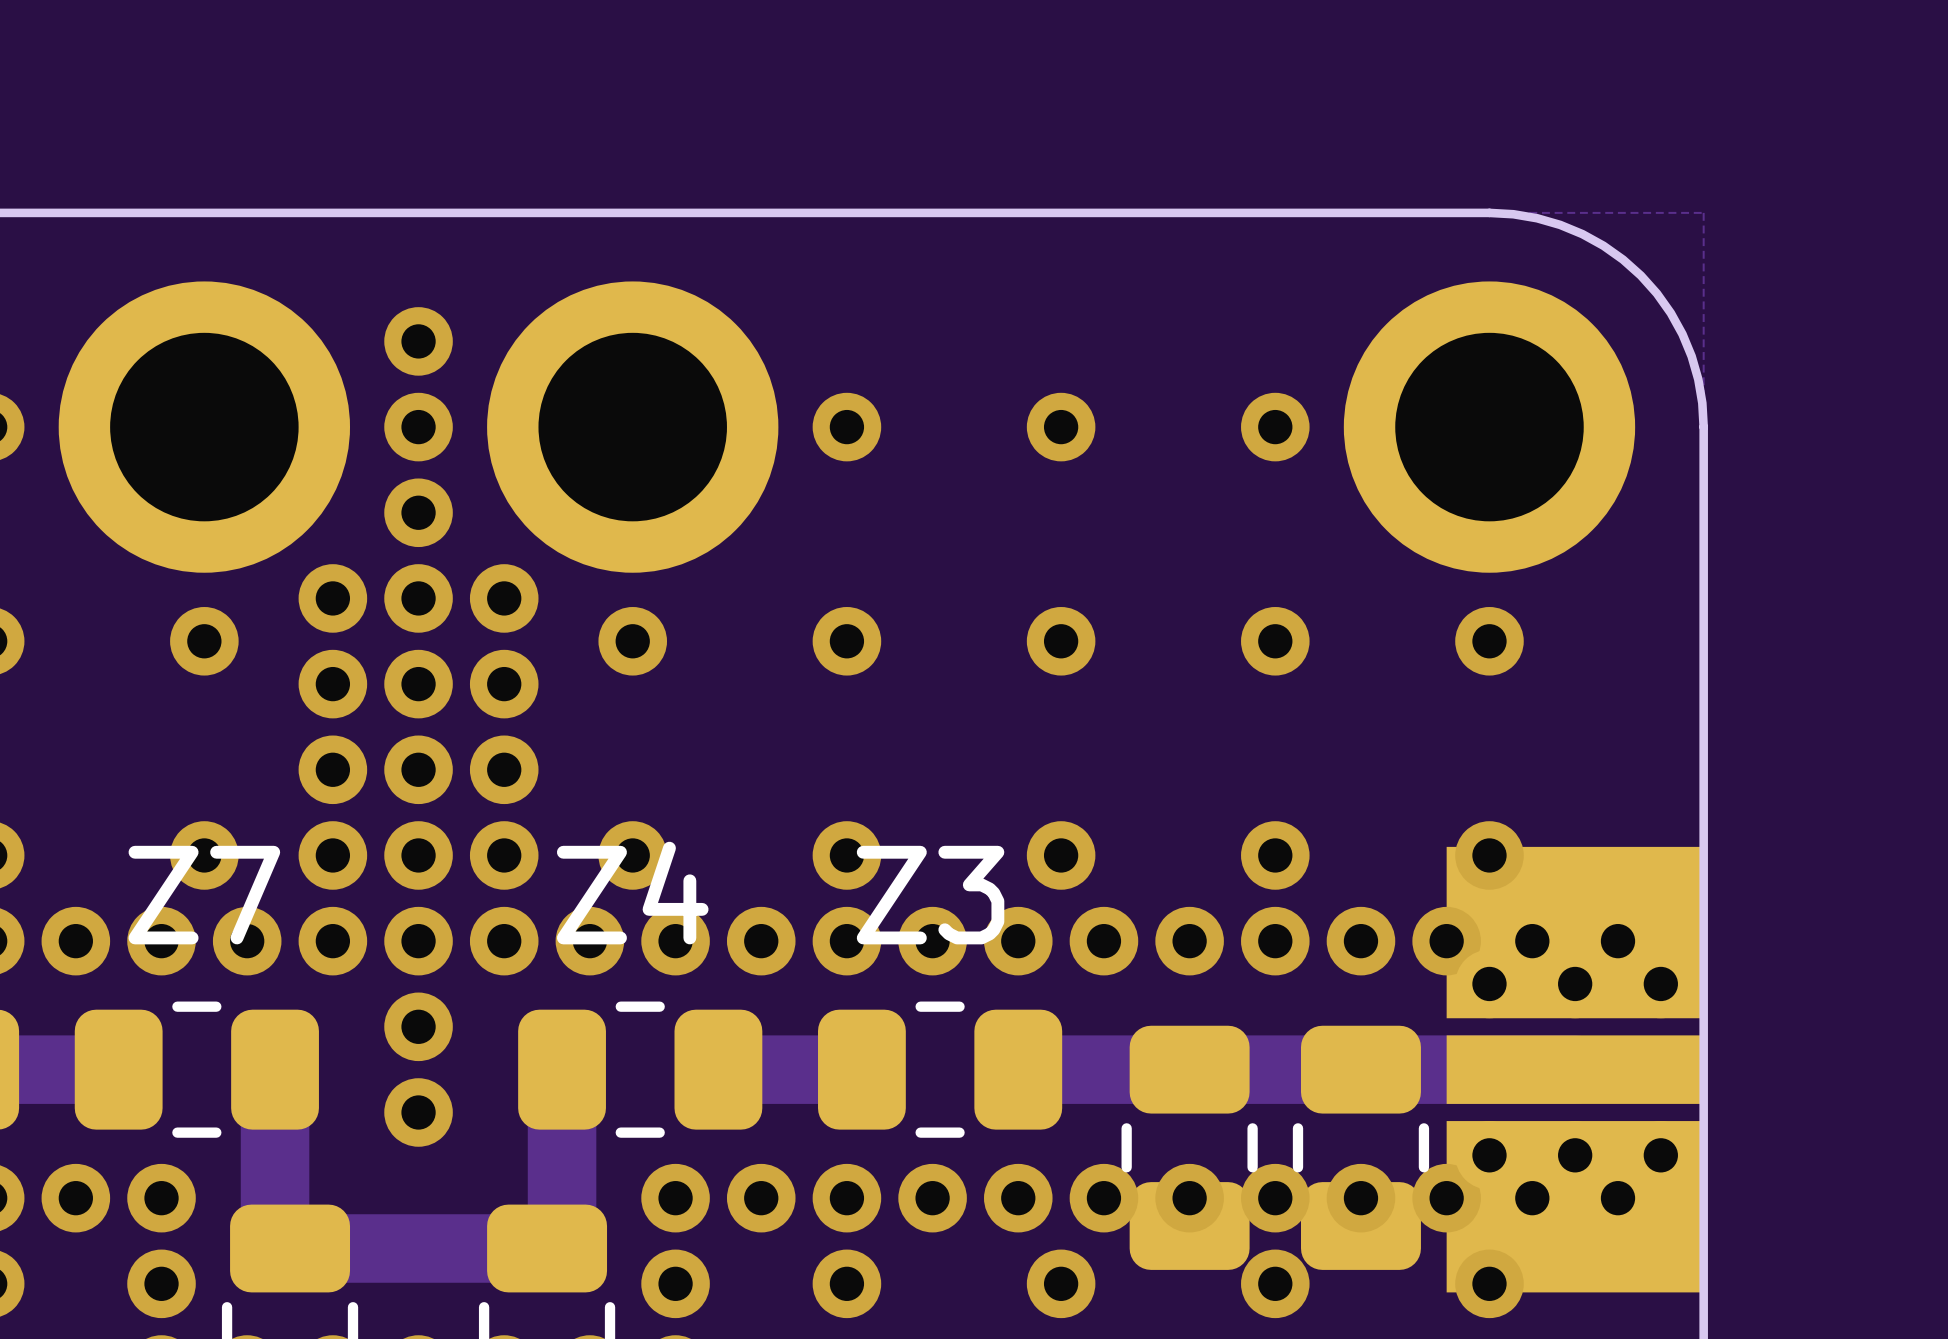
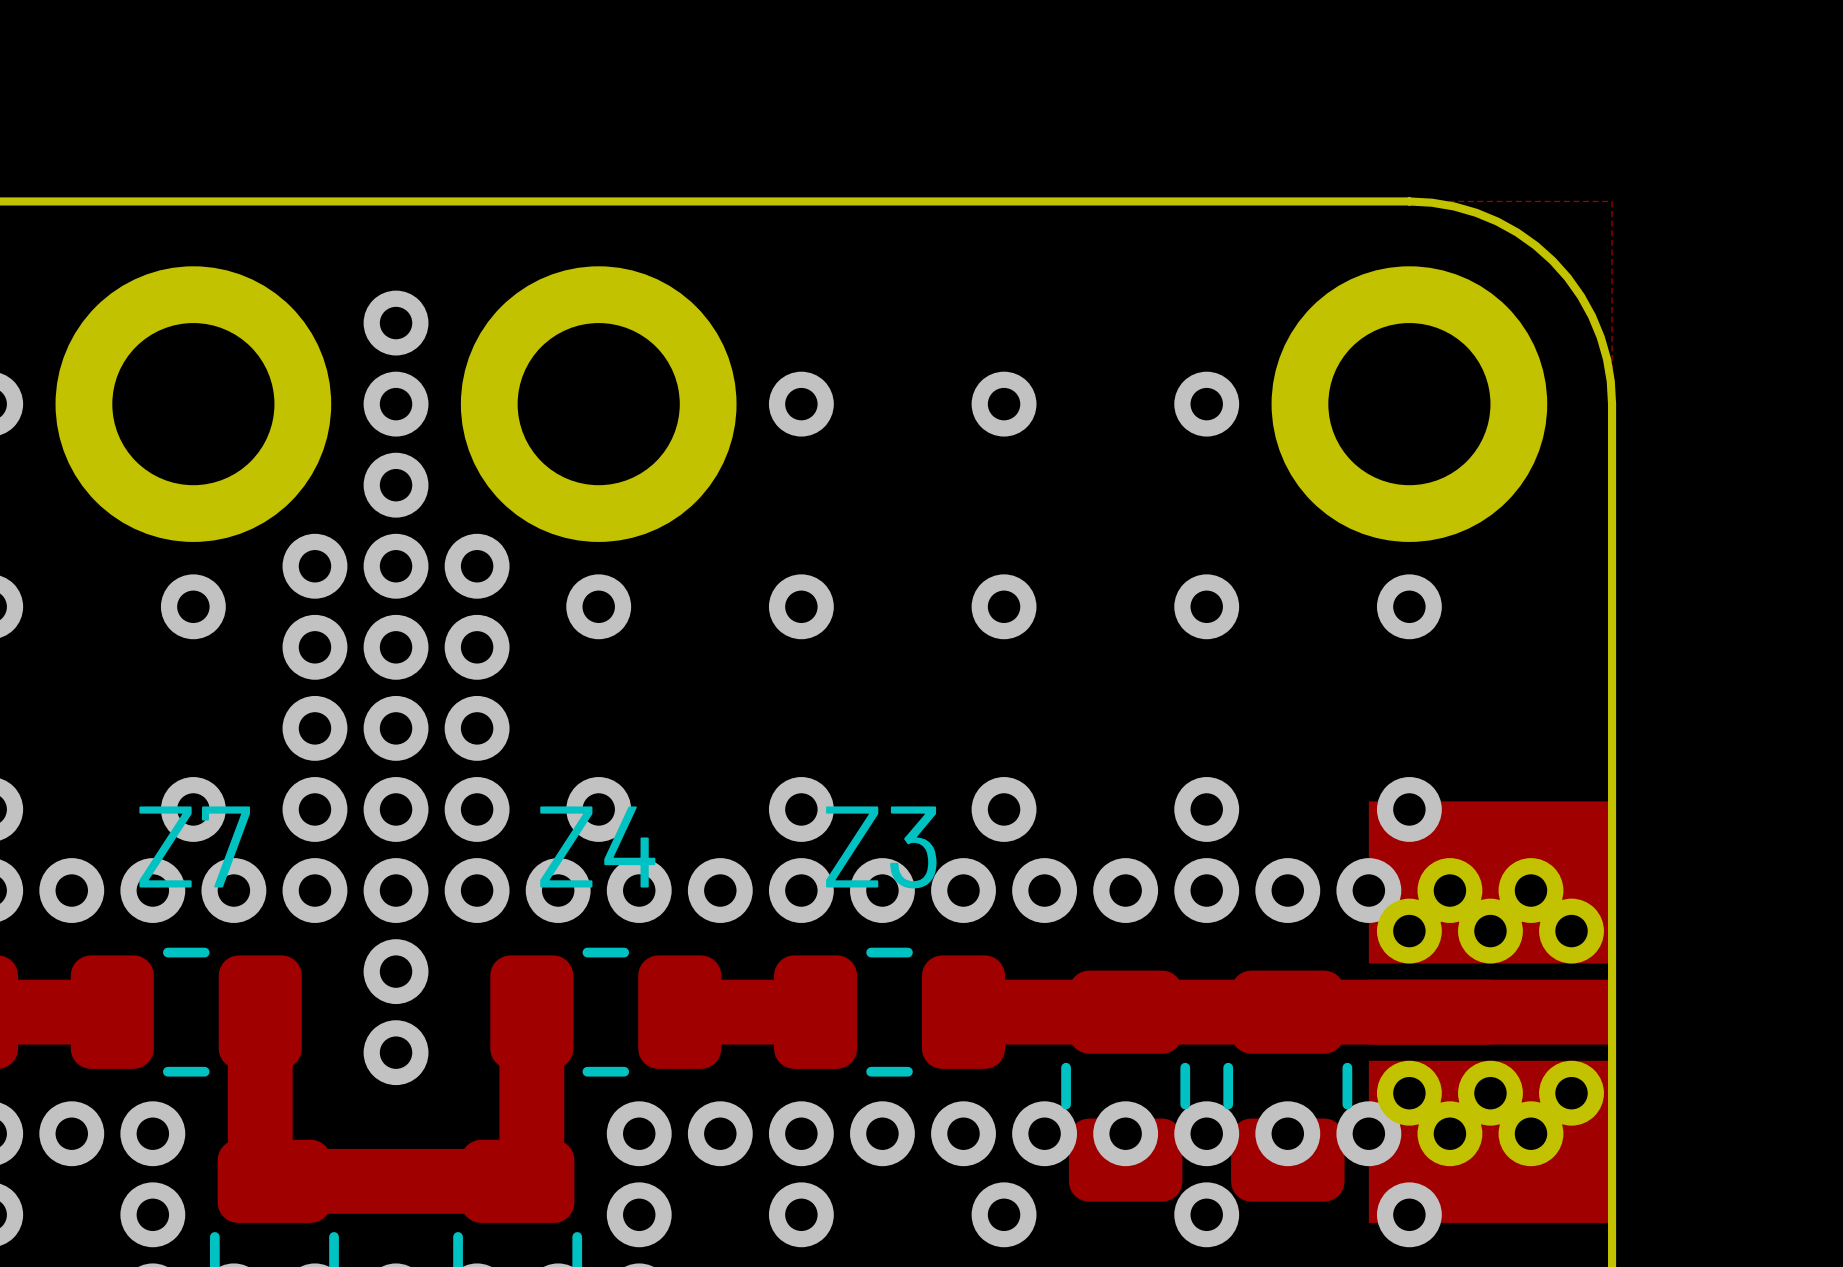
part footprint: [58, 281, 351, 573] -> [55, 266, 332, 542]
part footprint: [487, 281, 779, 573] -> [460, 266, 737, 542]
part footprint: [1343, 281, 1636, 573] -> [1271, 266, 1548, 542]

